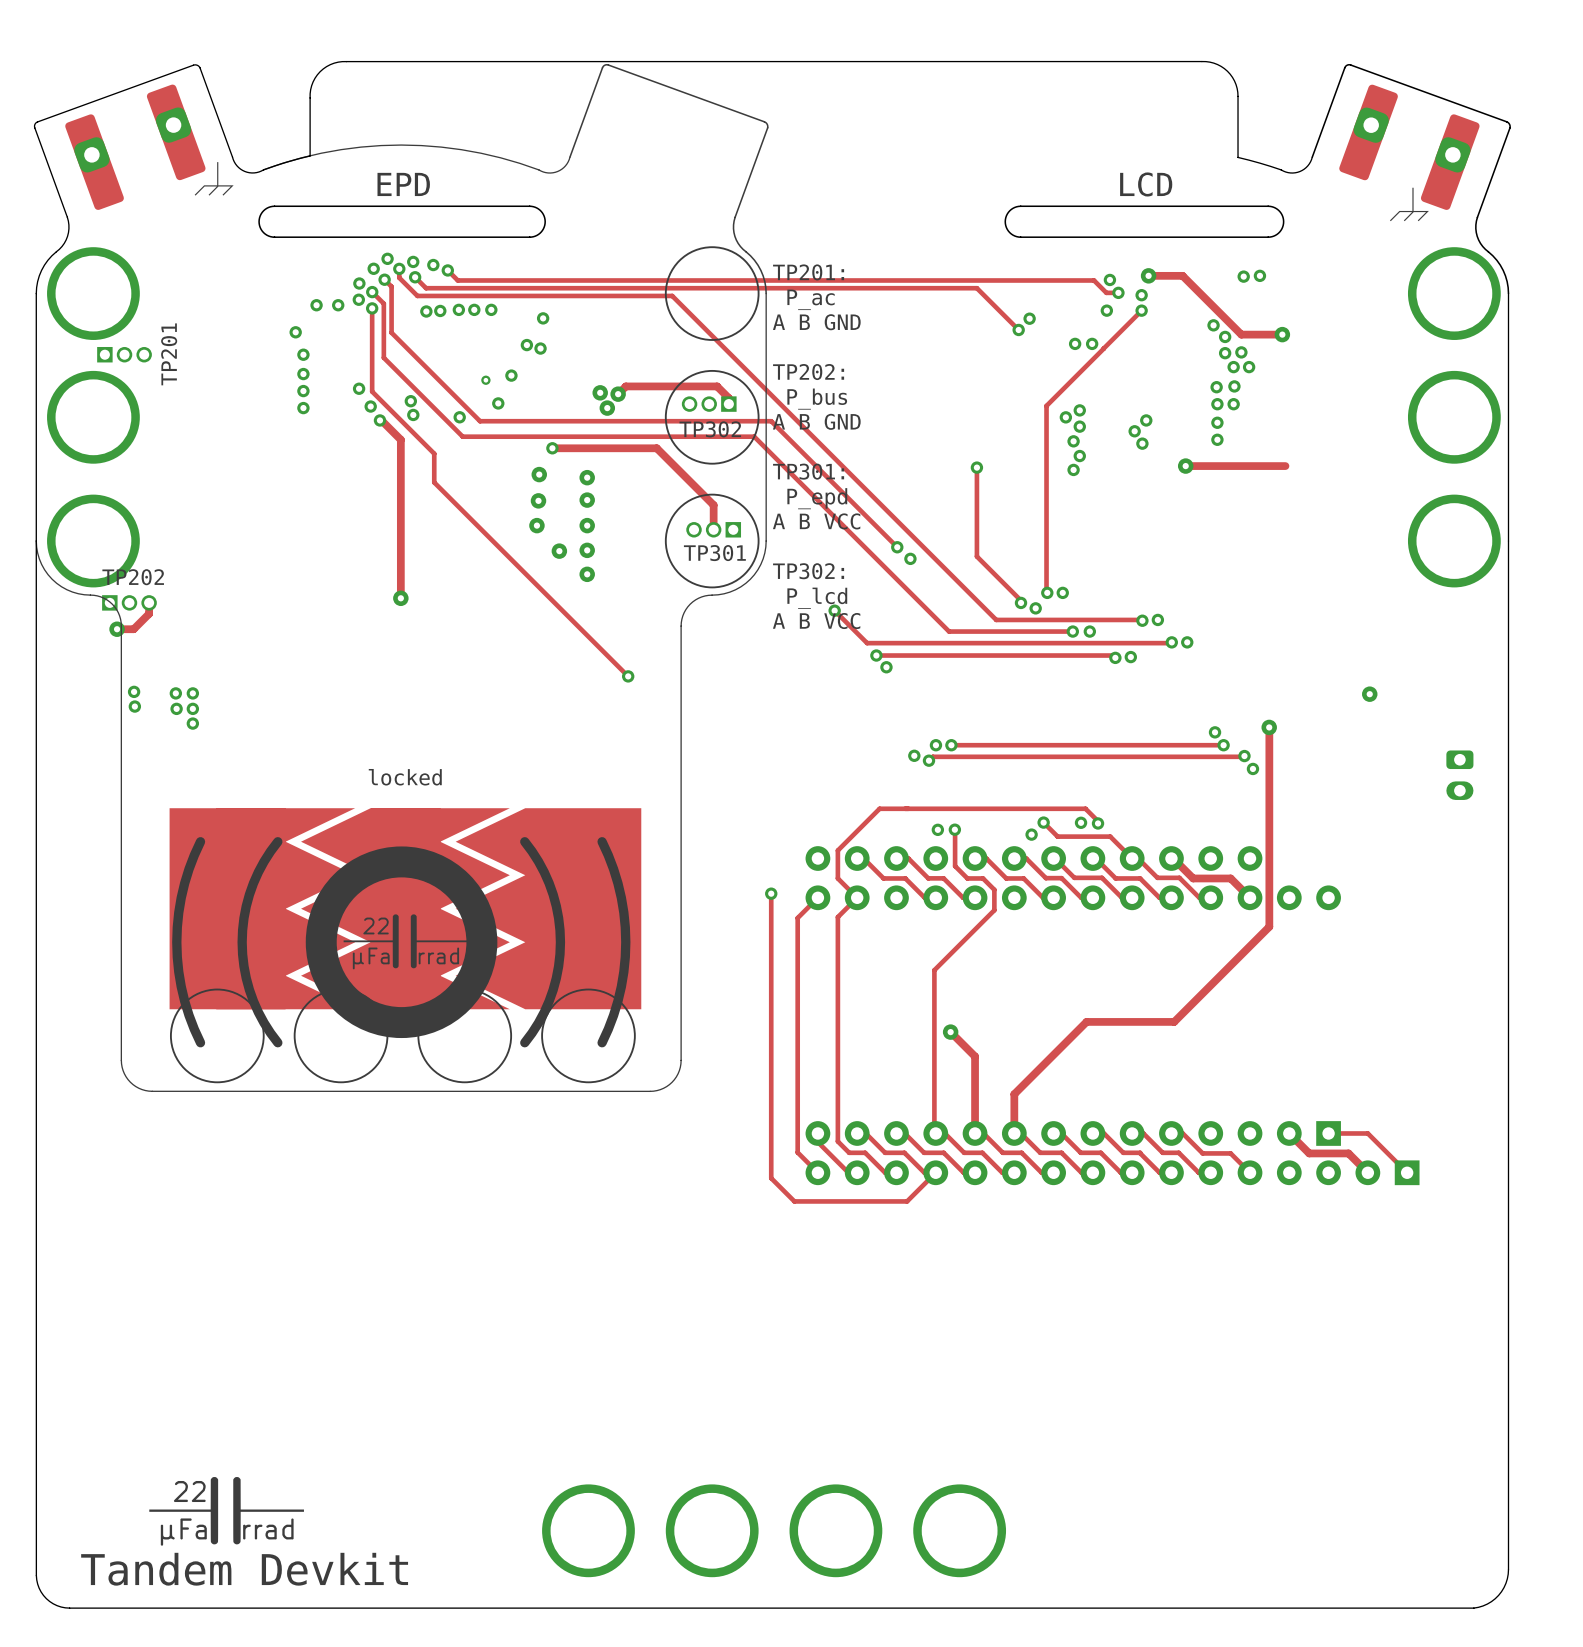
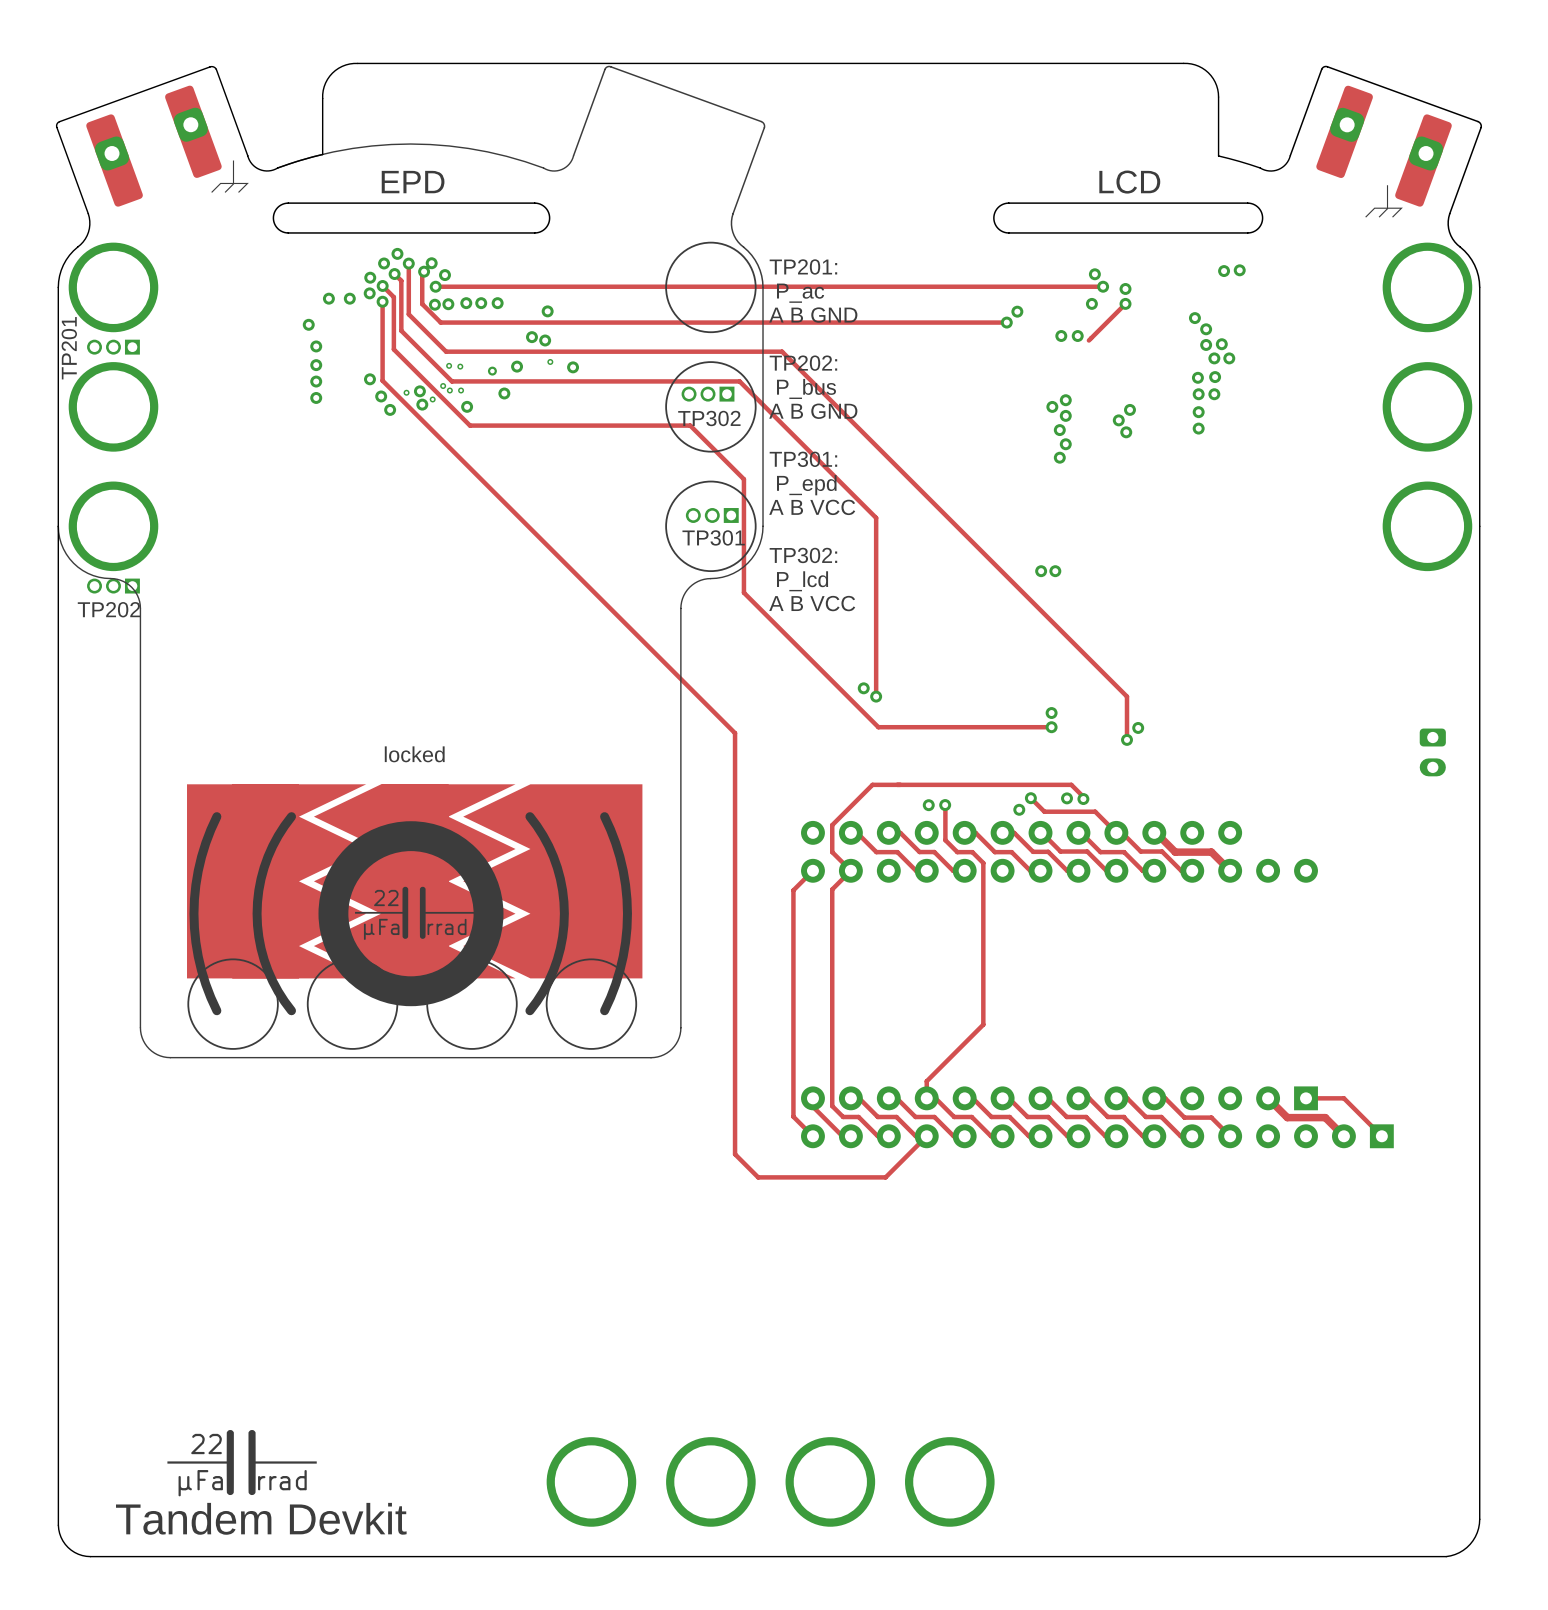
via: (413, 261) -> none
via: (433, 265) -> none
via: none -> (431, 263)
track: (447, 270) (457, 280) (1094, 280) (1106, 292) -> (435, 286) (1091, 286)
via position: (447, 270) -> (445, 275)
track: (1148, 275) (1182, 275) (1241, 334) (1282, 334) -> none
via: (1148, 275) -> none
track: (399, 277) (417, 295) (672, 295) (996, 619) (1142, 620) -> (408, 272) (408, 314) (446, 351) (782, 351) (1127, 696) (1127, 739)
track: (415, 277) (426, 288) (976, 288) (1018, 329) -> (422, 274) (422, 304) (440, 322) (1006, 322)
via: none -> (435, 286)
track: (391, 332) (480, 421) (771, 421) (897, 547) -> (401, 325) (401, 330) (451, 381) (739, 381) (876, 517) (876, 696)
via: (1282, 334) -> none
track: (1103, 348) (1046, 405) (1047, 592) -> none
TP201 rotation: 0° (124, 354) -> 180° (113, 347)
via: none -> (550, 361)
via: none -> (449, 365)
via: none -> (460, 366)
track: (372, 390) (434, 453) (434, 482) (628, 676) -> (382, 380) (735, 733) (735, 1154) (758, 1177) (885, 1177) (899, 1163)
via: (600, 392) -> none
track: (618, 394) (625, 386) (717, 386) (728, 398) (728, 404) -> none
via: (618, 394) -> none
via: none -> (443, 386)
via: none -> (449, 390)
via: none -> (461, 390)
via: none -> (406, 392)
via: (607, 408) -> none
via: none -> (432, 399)
track: (379, 420) (400, 439) (400, 598) -> none
track: (690, 436) (754, 436) (949, 631) (1072, 631) -> (690, 425) (743, 479) (743, 592) (878, 727) (1051, 727)
track: (552, 448) (656, 448) (713, 505) (713, 529) -> none
via position: (552, 448) -> (573, 367)
track: (1185, 466) (1285, 466) -> none
via: (1185, 466) -> none
track: (976, 467) (976, 556) (1021, 600) (1021, 602) -> none
via: (976, 467) -> none
via: (539, 474) -> none
via: (587, 477) -> none
via: (538, 500) -> none
via: (587, 500) -> none
via: (536, 525) -> none
via: (587, 525) -> none
via: (897, 547) -> none
via: (587, 550) -> none
via: (559, 551) -> none
via: (910, 558) -> none
via: (587, 574) -> none
via: none -> (1041, 571)
via: none -> (1055, 571)
via: (1047, 592) -> none
via: (1062, 592) -> none
via: (400, 598) -> none
TP202 rotation: 0° (129, 602) -> 180° (113, 586)
TP202 position: (129, 602) -> (113, 586)
track: (149, 602) (149, 613) (133, 629) (117, 629) -> none
via: (1021, 602) -> none
via: (1035, 608) -> none
track: (834, 610) (867, 643) (1171, 642) -> none
via: (834, 610) -> none
via: (1157, 619) -> none
via: (1142, 620) -> none
via: (117, 629) -> none
via: (1072, 631) -> none
via: (1089, 631) -> none
via: (1171, 642) -> none
via: (1187, 642) -> none
track: (876, 655) (1113, 655) (1115, 657) -> none
via: (876, 655) -> none
via: (1115, 657) -> none
via: (1130, 657) -> none
via: (886, 667) -> none
via: (628, 676) -> none
via: (134, 691) -> none
via: (175, 693) -> none
via: (192, 693) -> none
via: (1369, 694) -> none
via: (134, 706) -> none
via: (176, 708) -> none
via: (192, 708) -> none
via: none -> (863, 688)
via: none -> (876, 696)
via: (192, 723) -> none
track: (1269, 727) (1269, 926) (1174, 1021) (1086, 1021) (1014, 1094) (1014, 1133) -> none
via: (1269, 727) -> none
via: (1215, 732) -> none
via: none -> (1051, 713)
via: (935, 745) -> none
track: (951, 745) (1223, 745) -> none
via: (951, 745) -> none
via: (1223, 745) -> none
via: none -> (1051, 727)
via: none -> (1138, 727)
via: (914, 755) -> none
track: (1244, 756) (932, 756) (928, 760) -> none
via: (1244, 756) -> none
via: (928, 760) -> none
via: none -> (1127, 739)
via: (1252, 768) -> none
track: (771, 893) (771, 1178) (794, 1201) (907, 1201) -> none
via: (771, 893) -> none
track: (994, 910) (934, 970) (935, 1133) -> (983, 882) (983, 1024) (926, 1081) (926, 1098)
track: (950, 1032) (975, 1056) (975, 1133) -> none
via: (950, 1032) -> none

